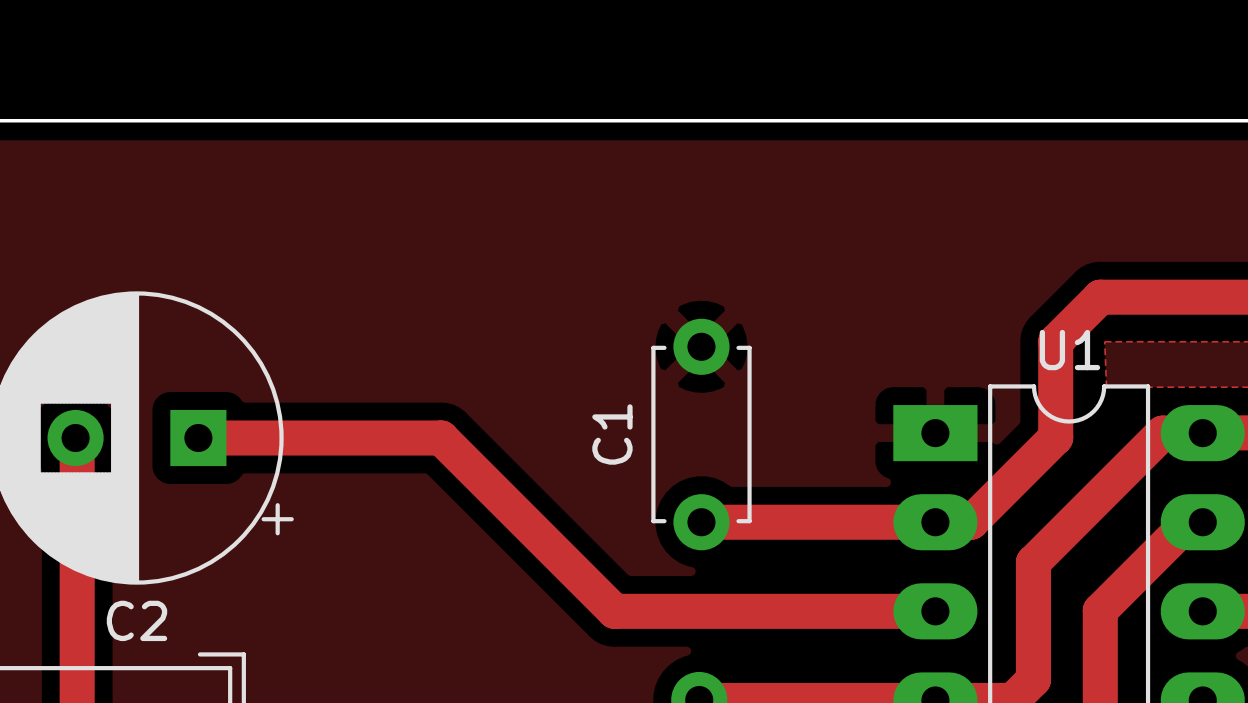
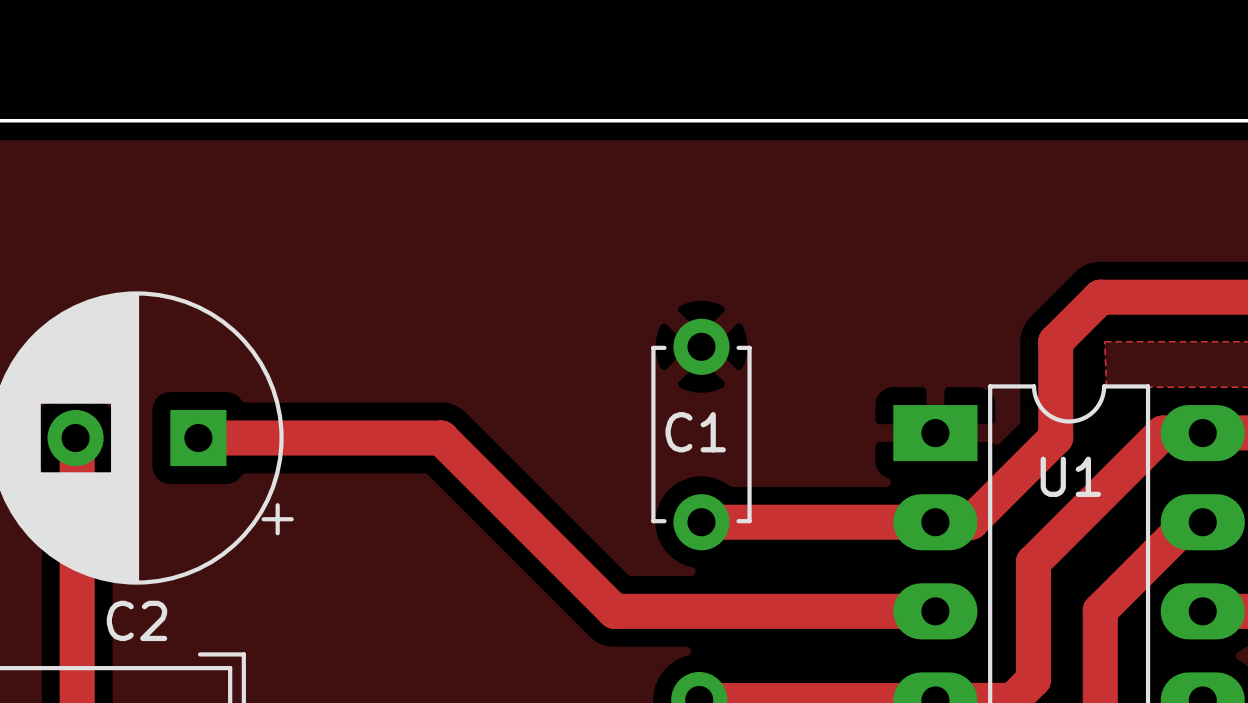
U1 name position: U1 (1069, 350) -> U1 (1070, 476)
C1 name rotation: 0° (612, 434) -> 90° clockwise (695, 432)

